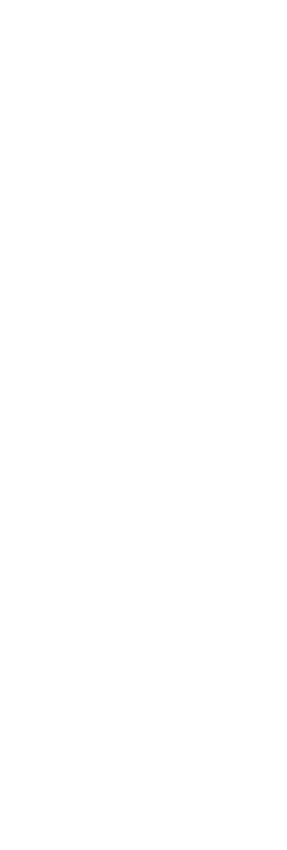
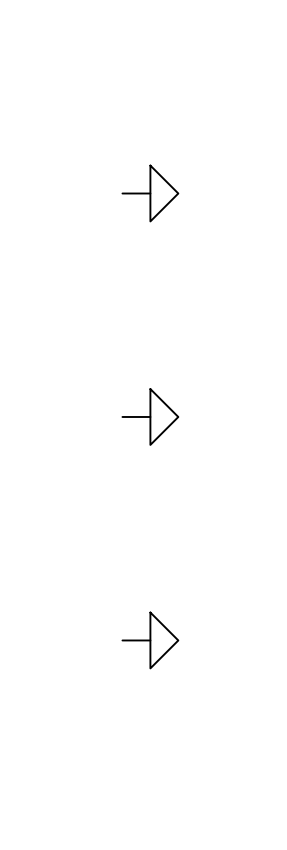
wire: none -> (122, 193) (150, 193)
power symbol: none -> (164, 193)
wire: none -> (122, 416) (150, 416)
power symbol: none -> (164, 416)
wire: none -> (122, 640) (150, 640)
power symbol: none -> (164, 640)

